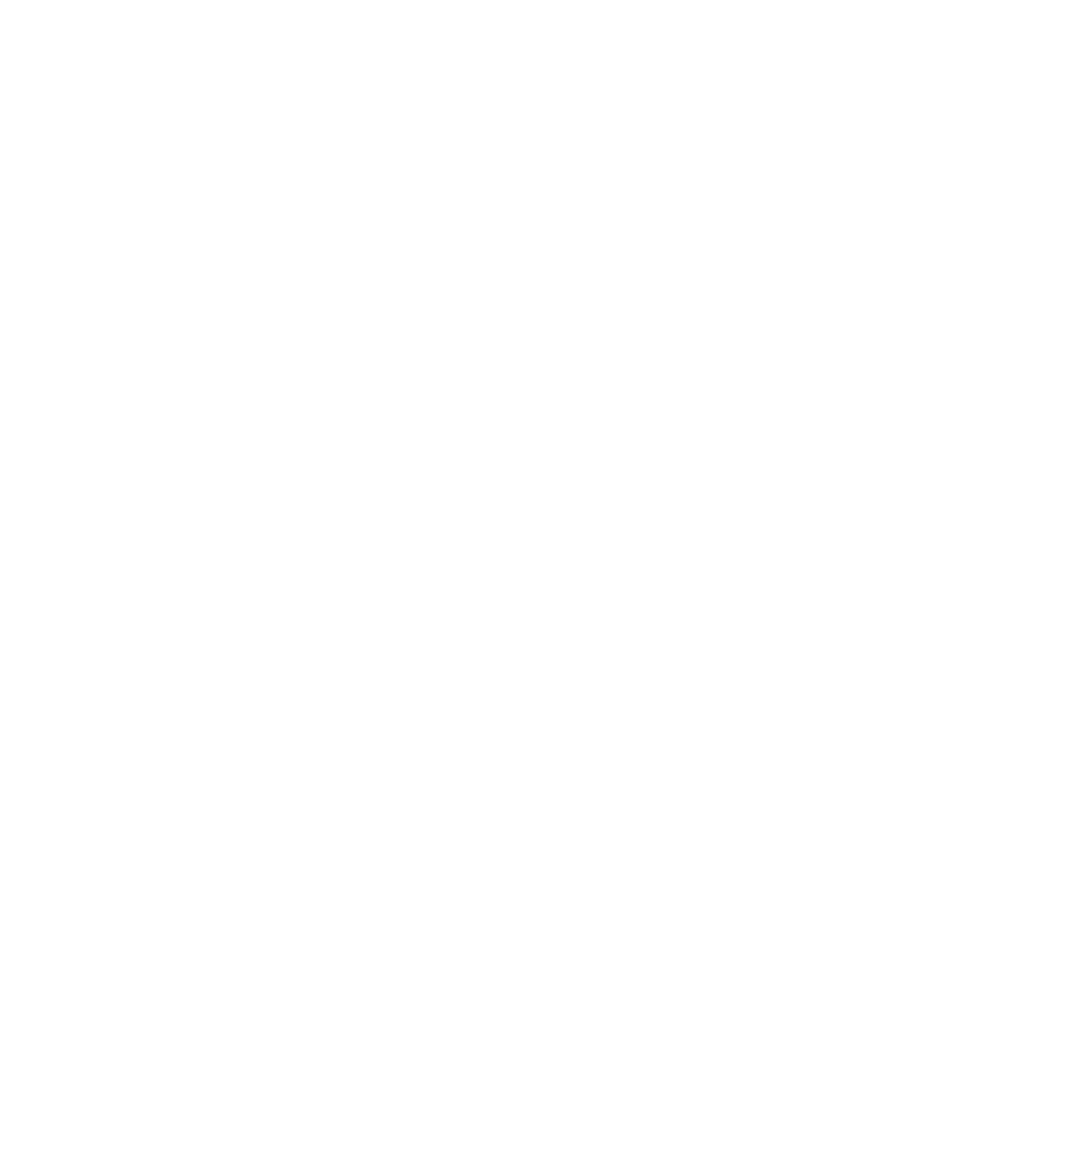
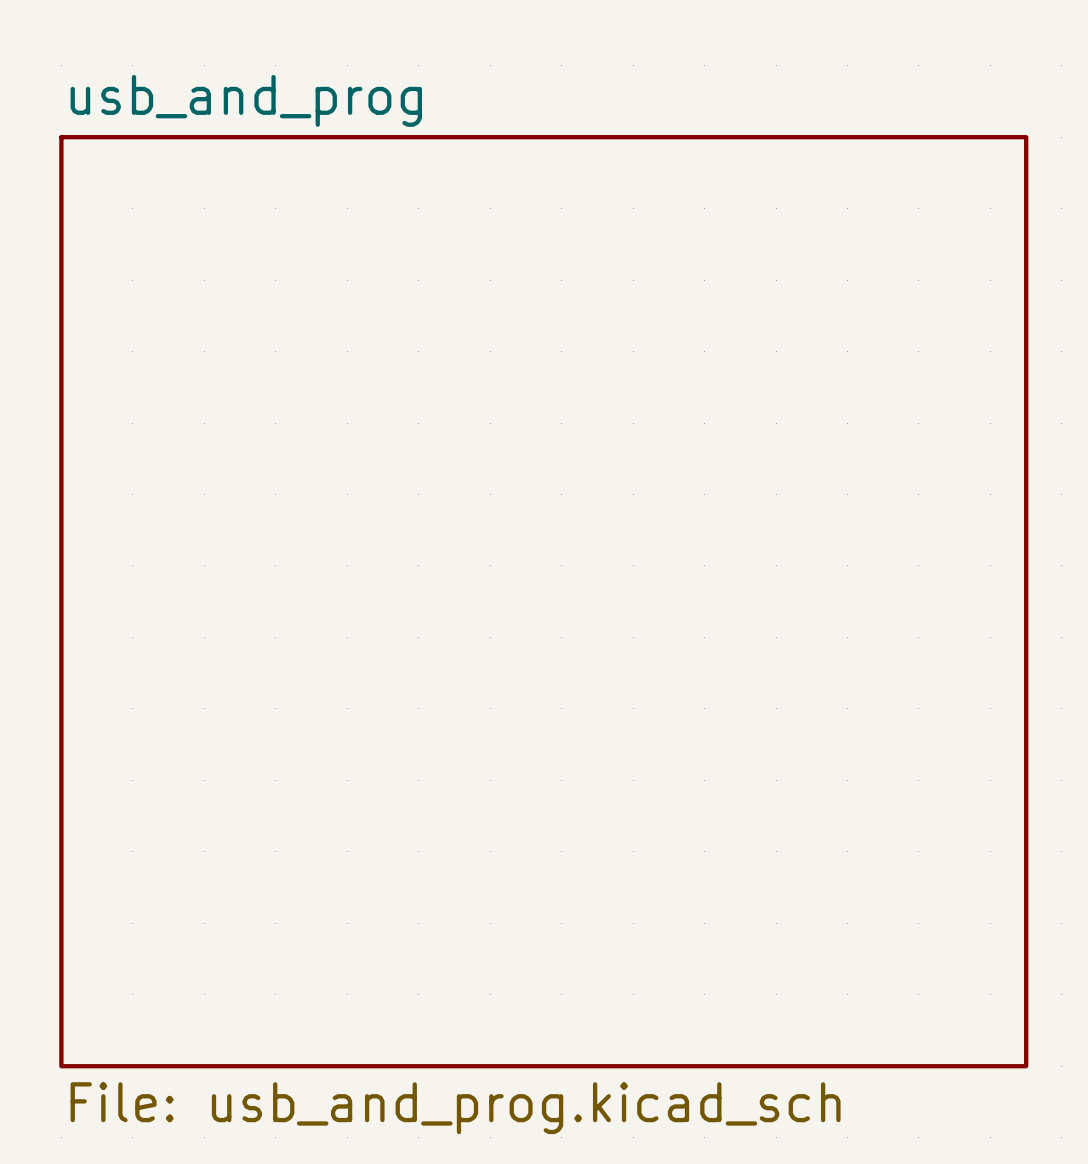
sheet usb_and_prog: none -> File: usb_and_prog.kicad_sch (543, 601)

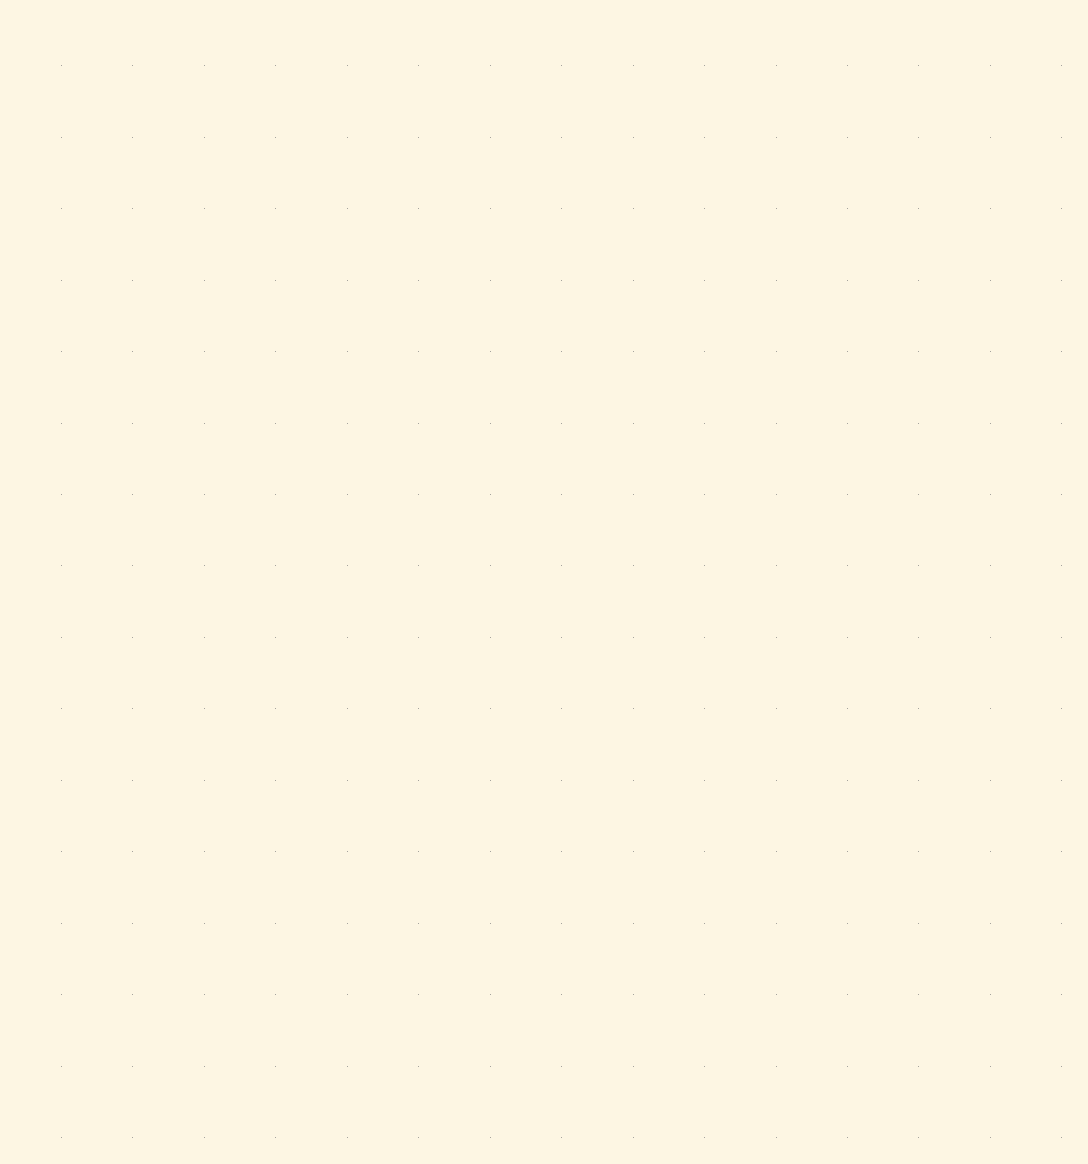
sheet usb_and_prog: File: usb_and_prog.kicad_sch (543, 601) -> none

